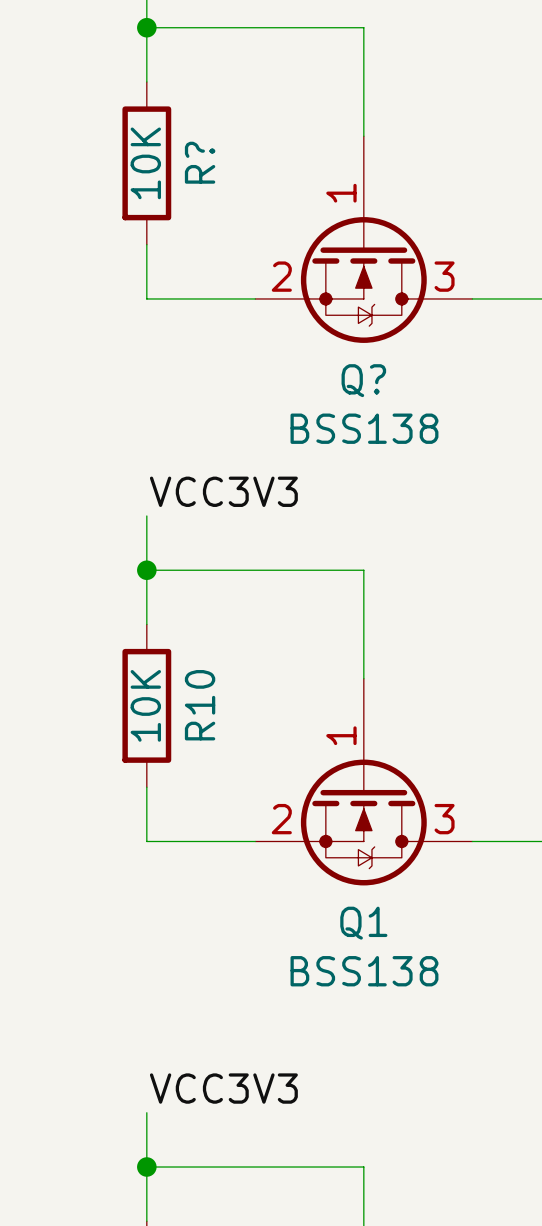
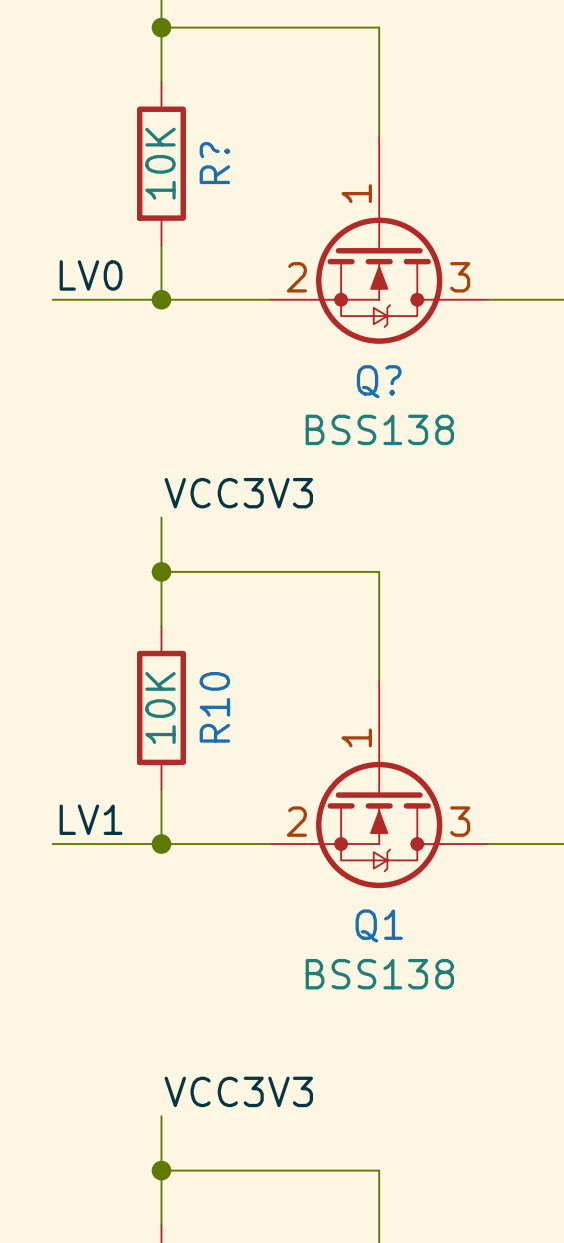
label: none -> LV0 (91, 275)
wire: none -> (52, 299) (161, 299)
junction: none -> (161, 299)
label: none -> LV1 (91, 819)
wire: none -> (52, 844) (161, 844)
junction: none -> (161, 844)

